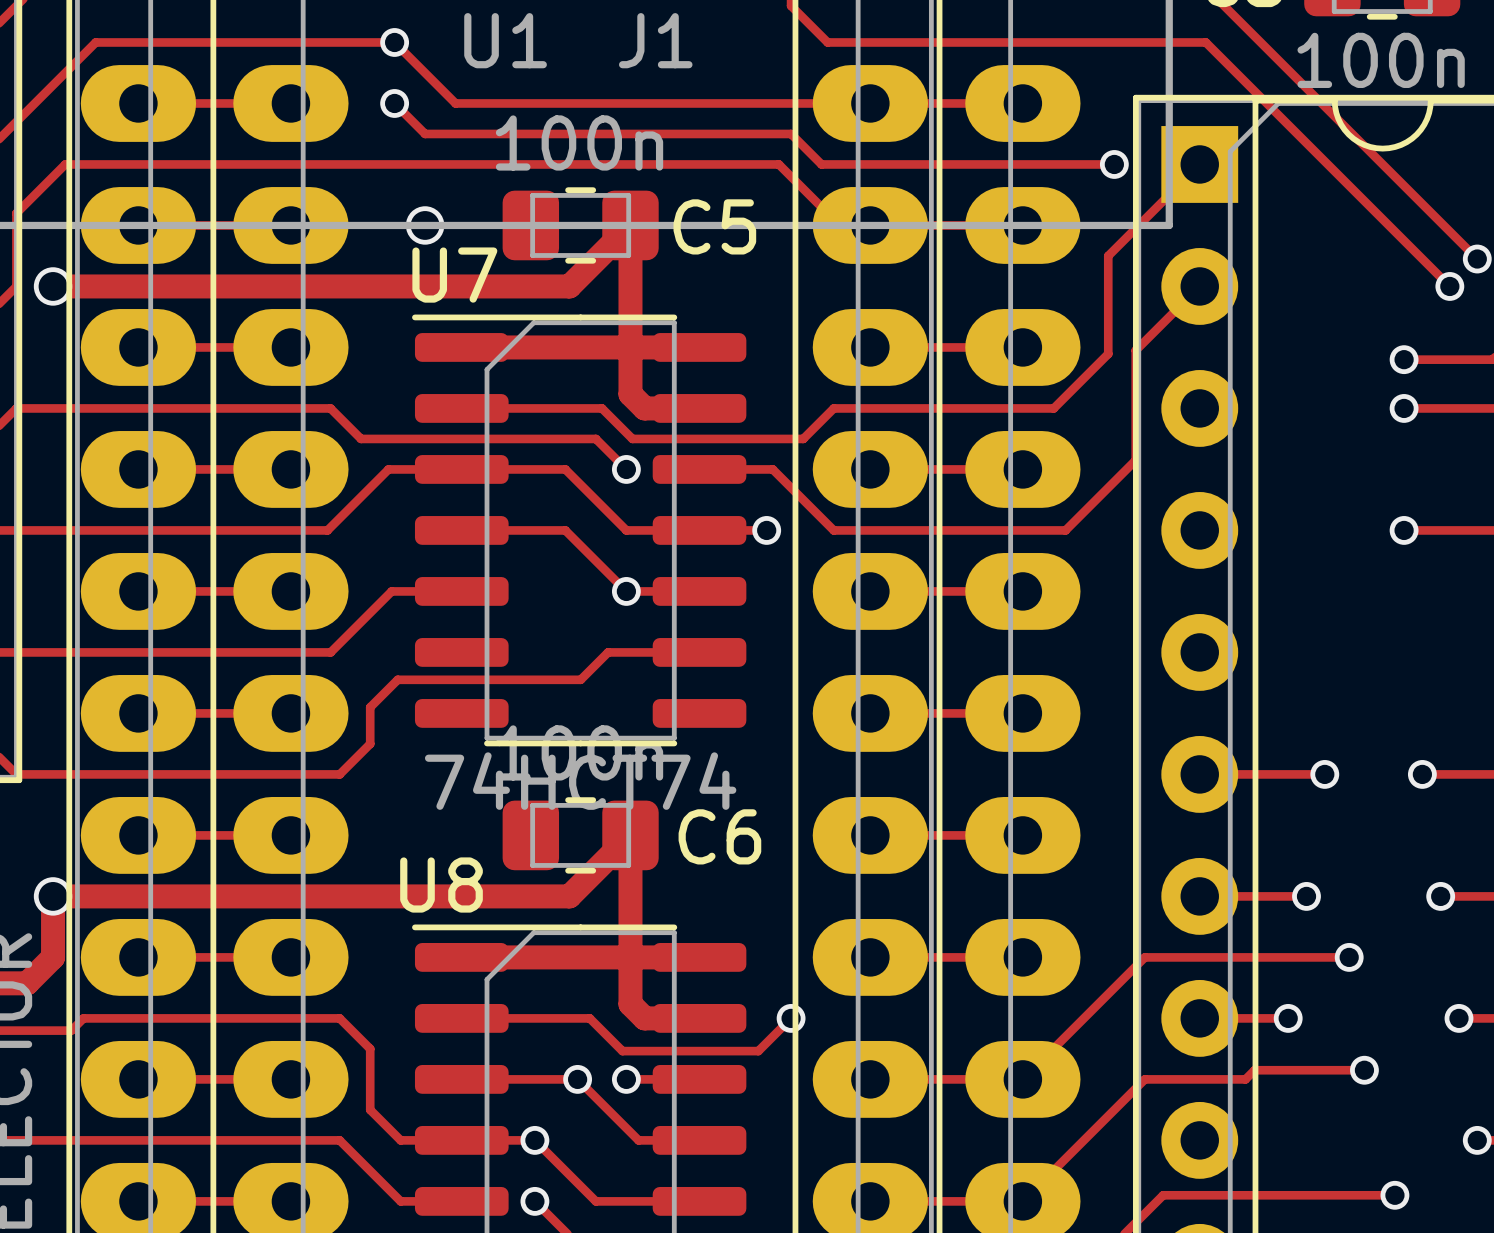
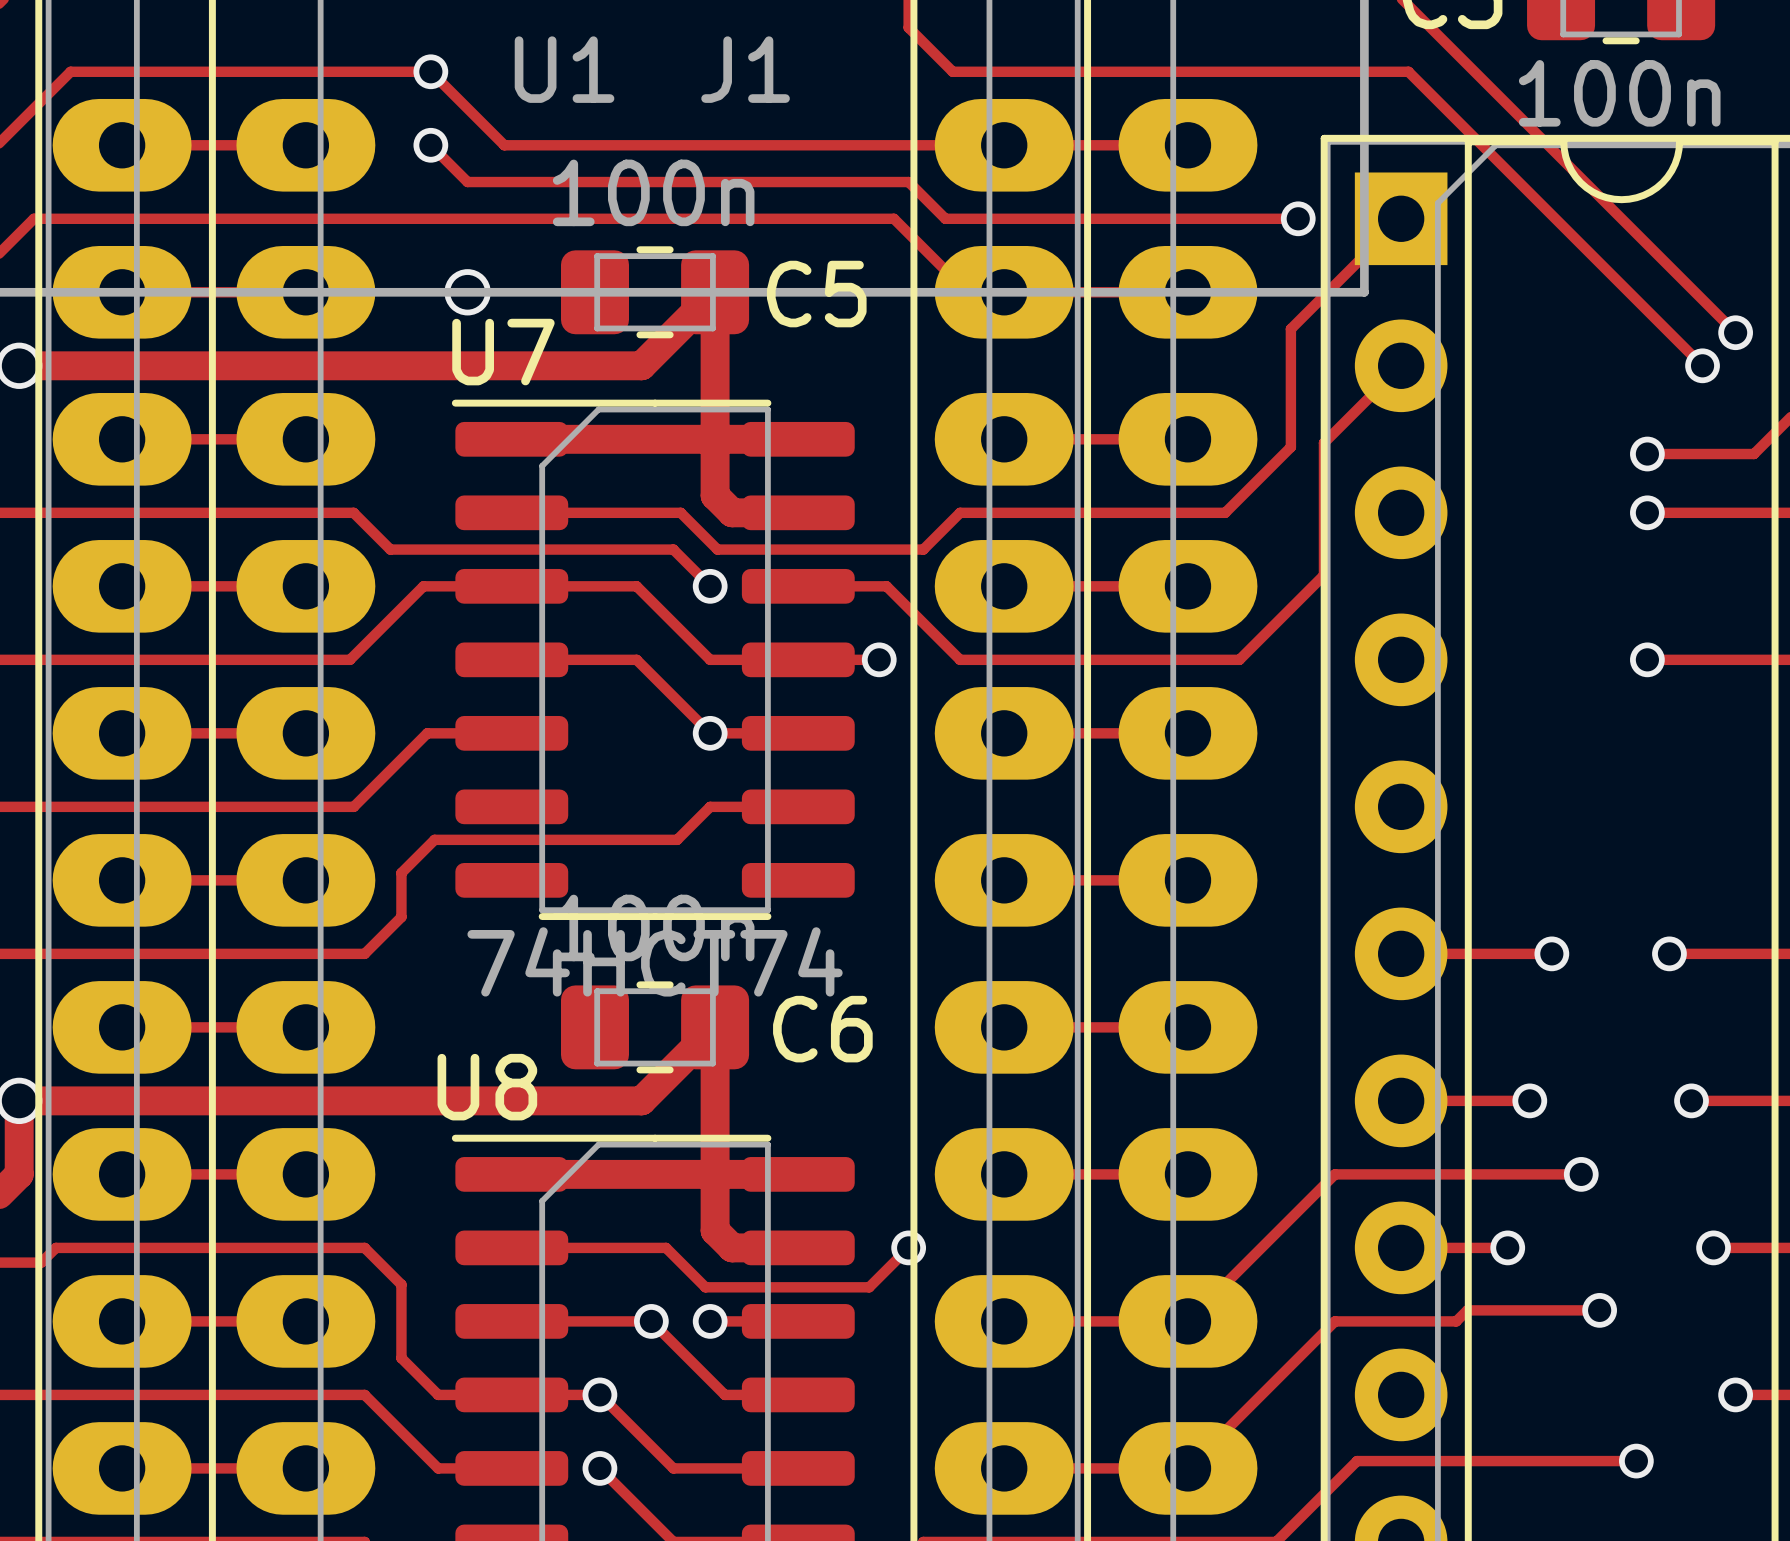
track: (626, 652) (608, 652) (580, 679) -> (710, 806) (677, 839) (655, 839)

